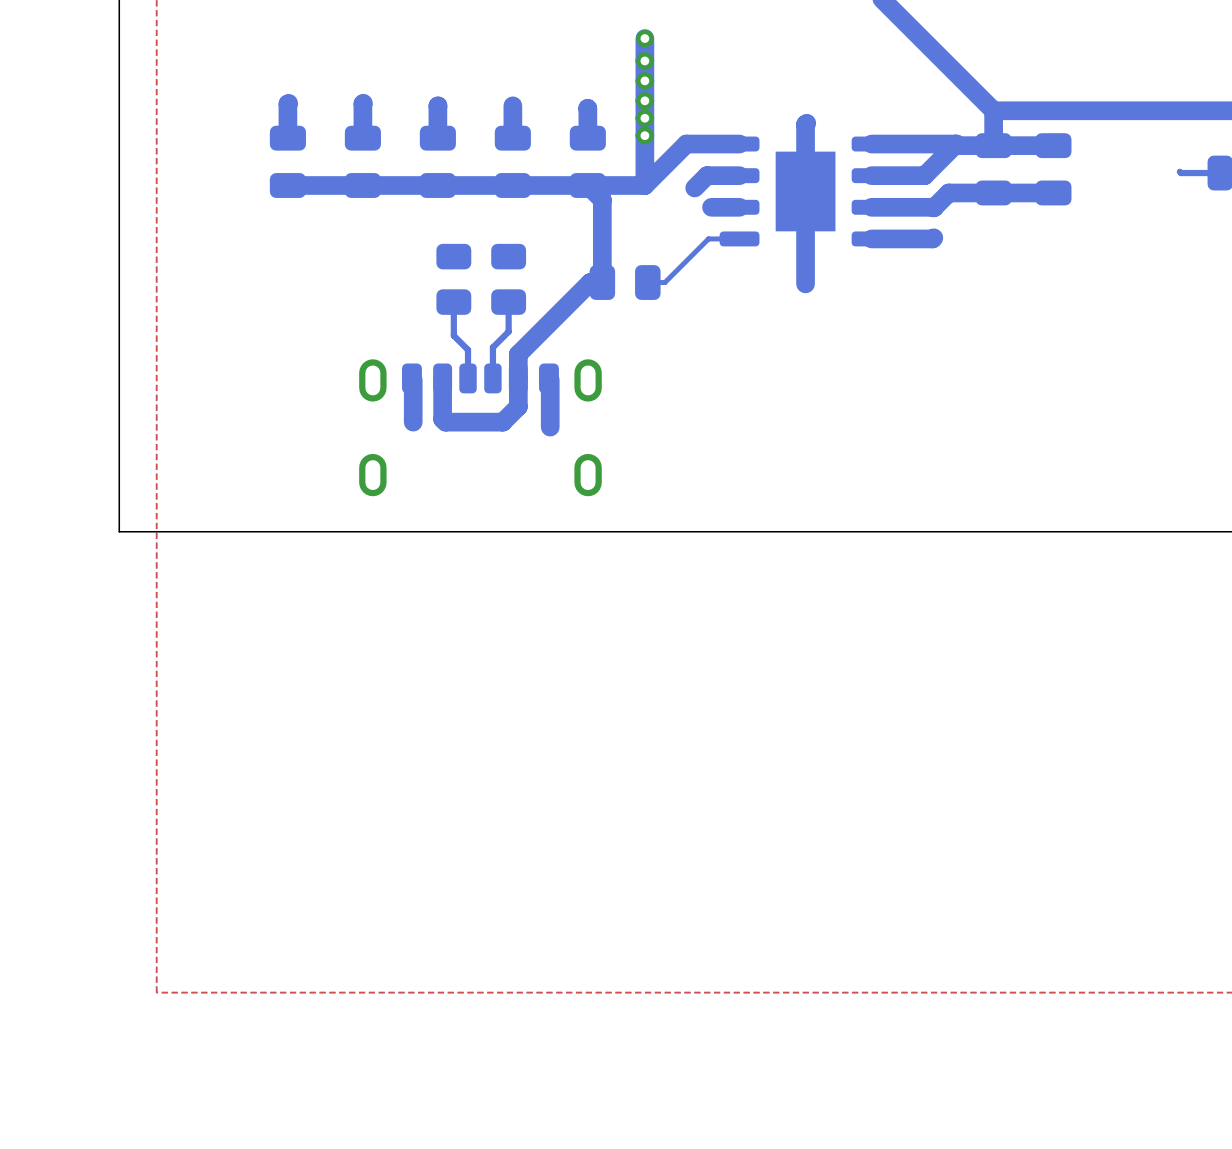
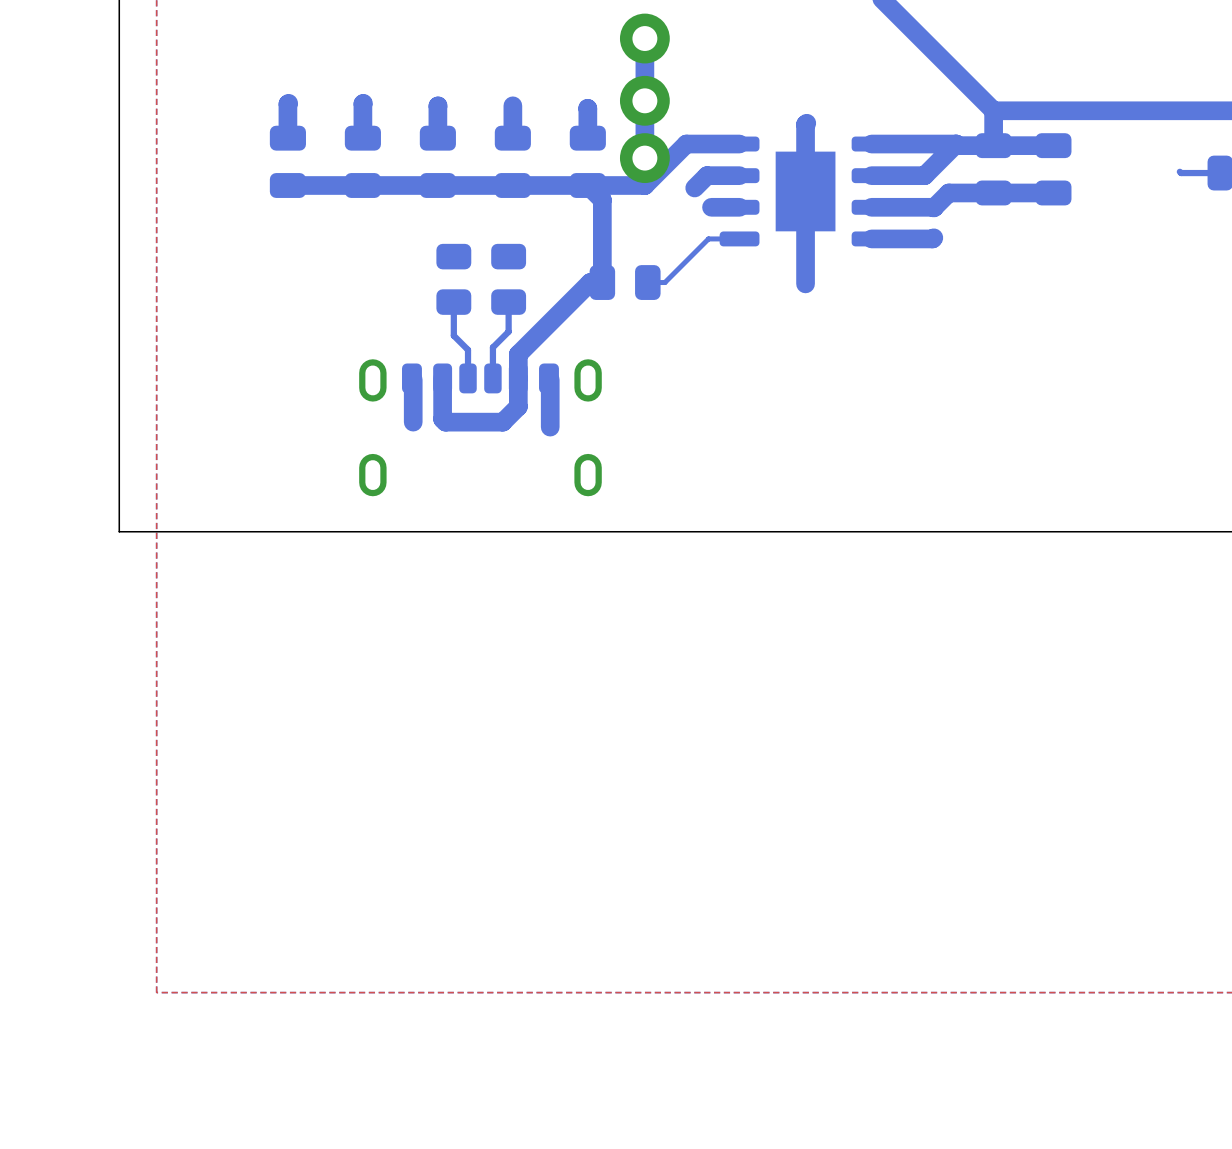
via size: [636, 29, 654, 48] -> [619, 13, 670, 64]
via: (644, 60) -> none
via: (644, 80) -> none
via size: [636, 92, 654, 110] -> [619, 75, 670, 126]
via: (644, 118) -> none
via size: [636, 126, 654, 145] -> [619, 133, 670, 184]

